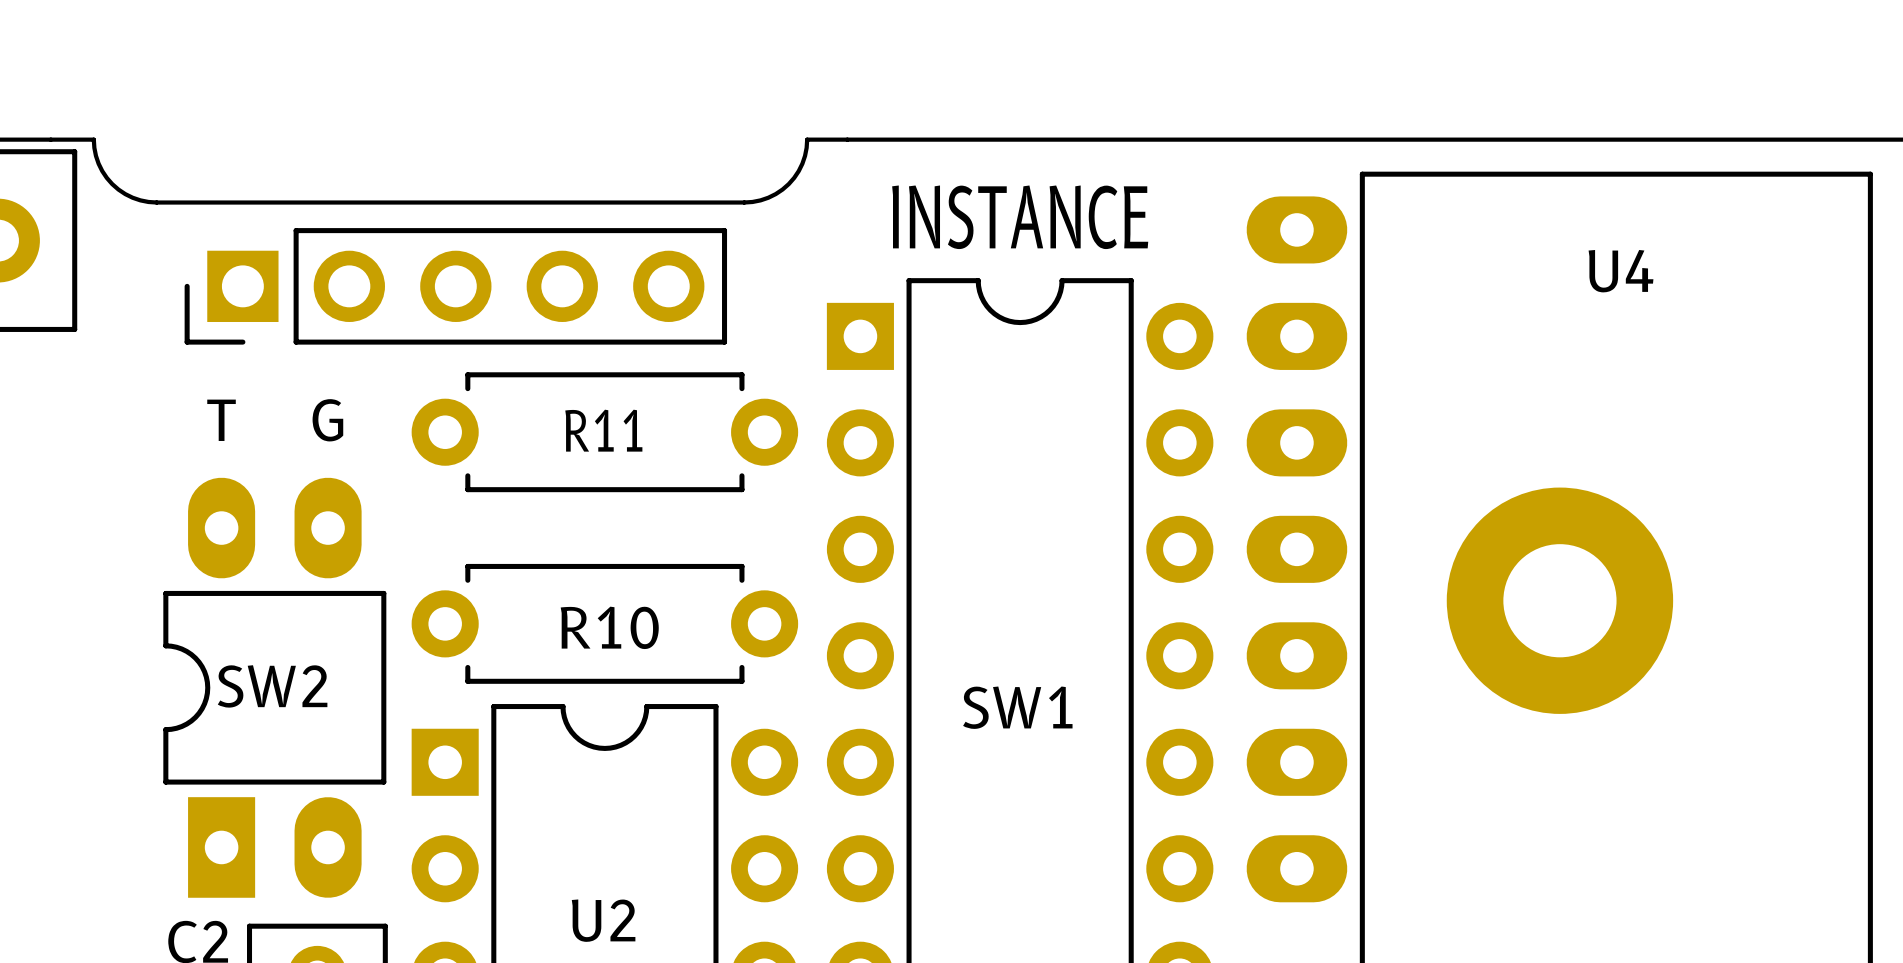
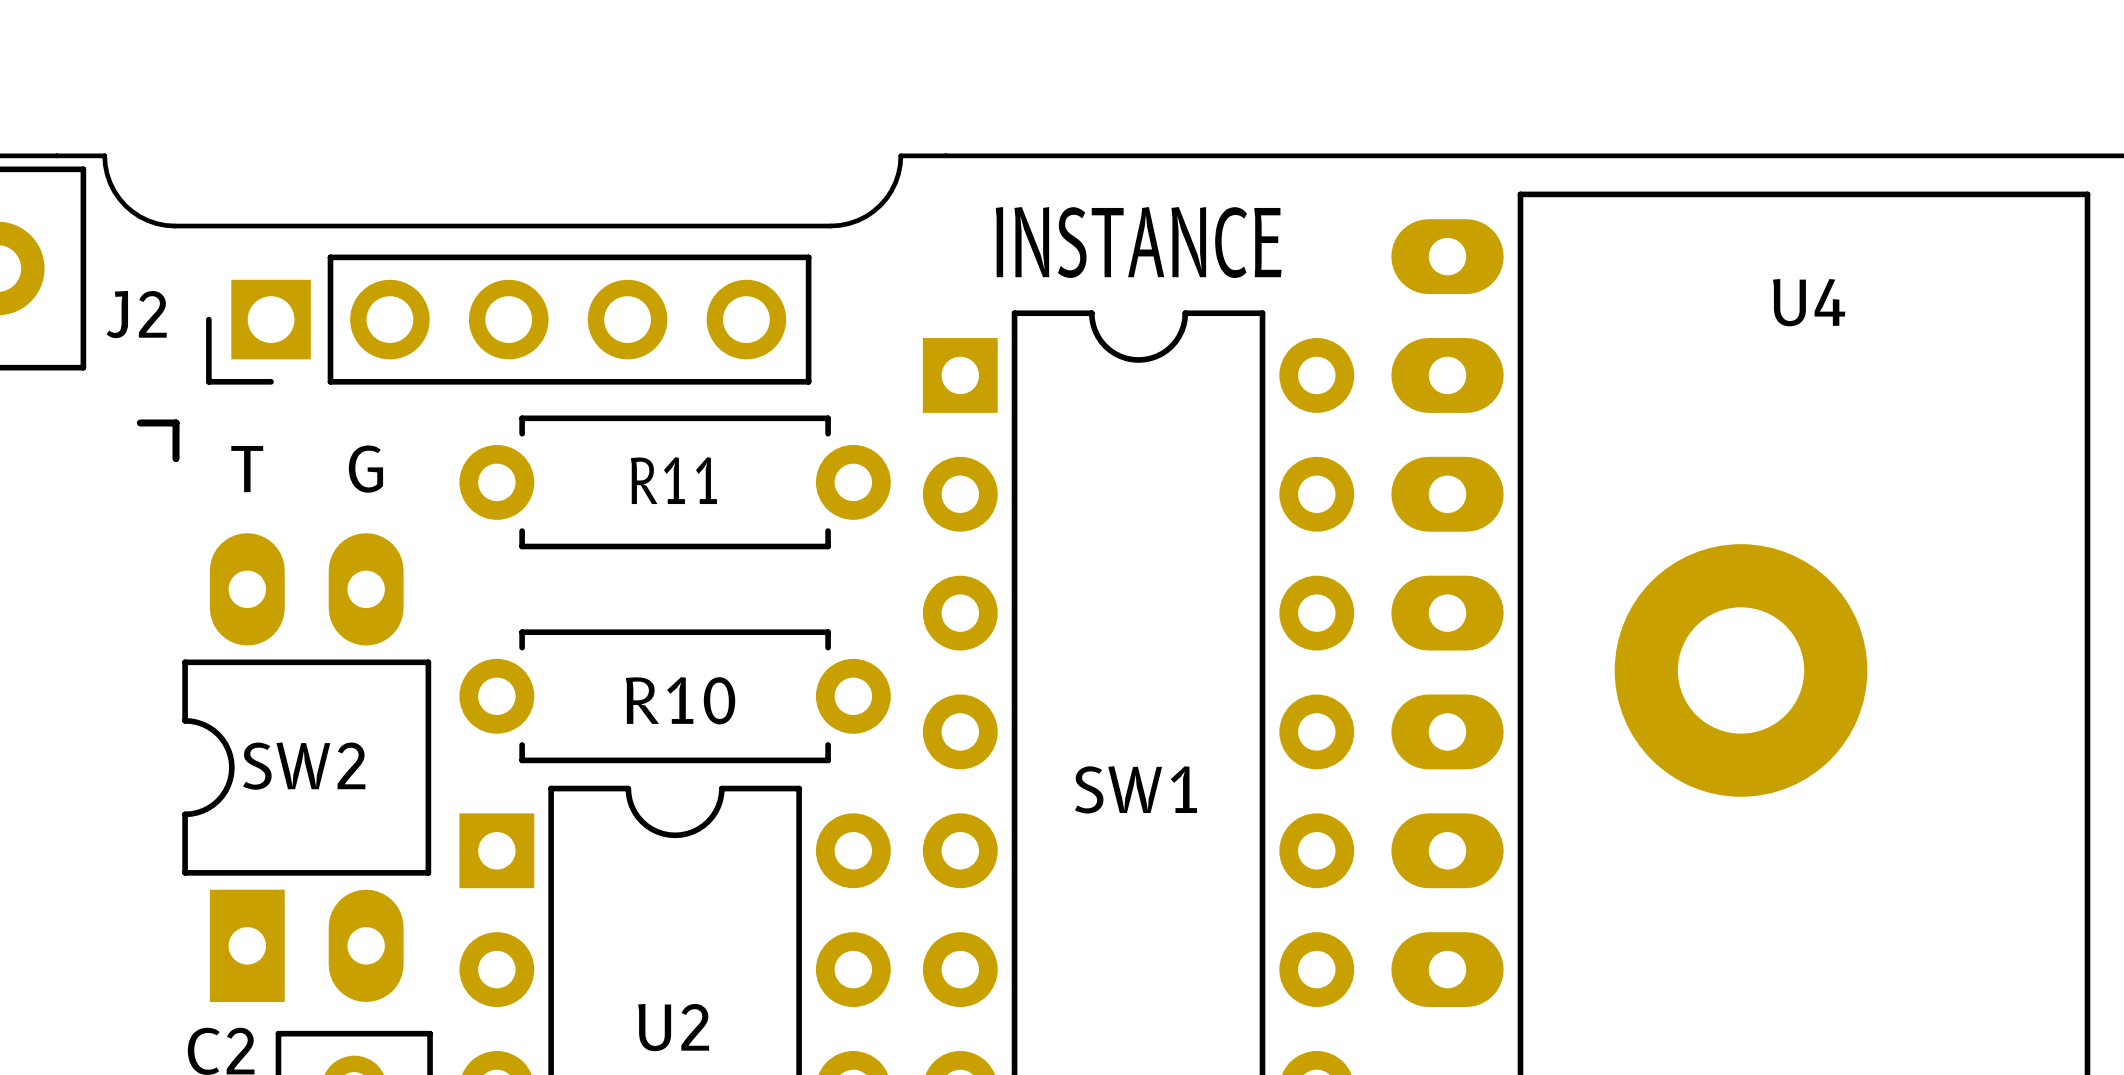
J2 name: none -> J2 (136, 314)
line: none -> (140, 422) (176, 422) (176, 458)

